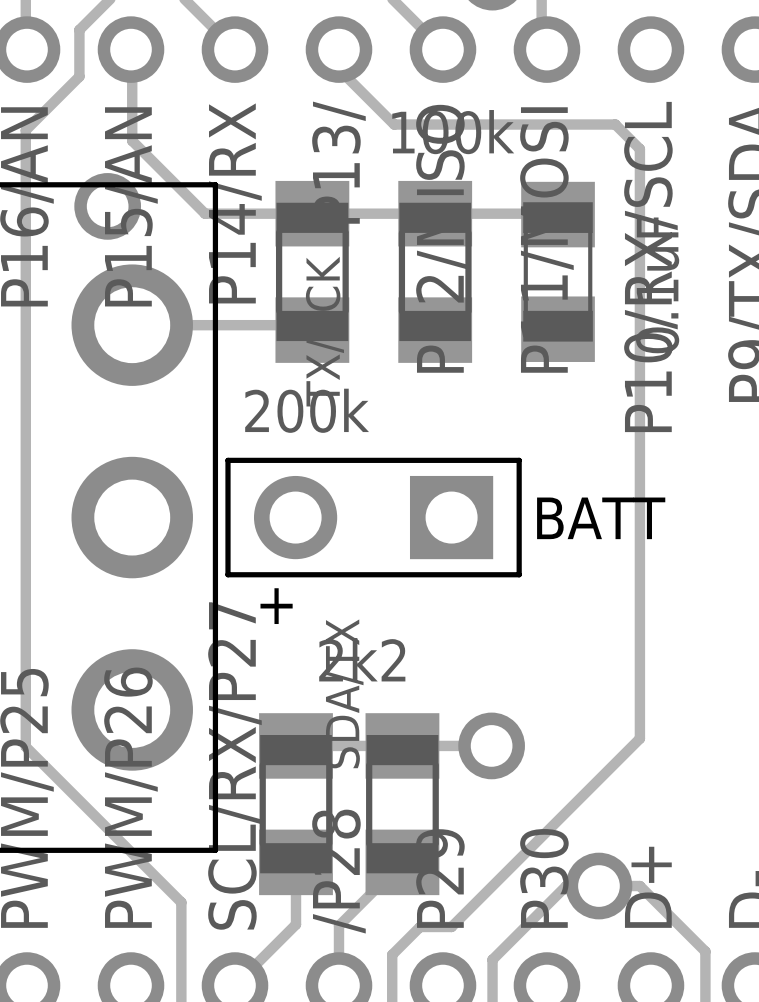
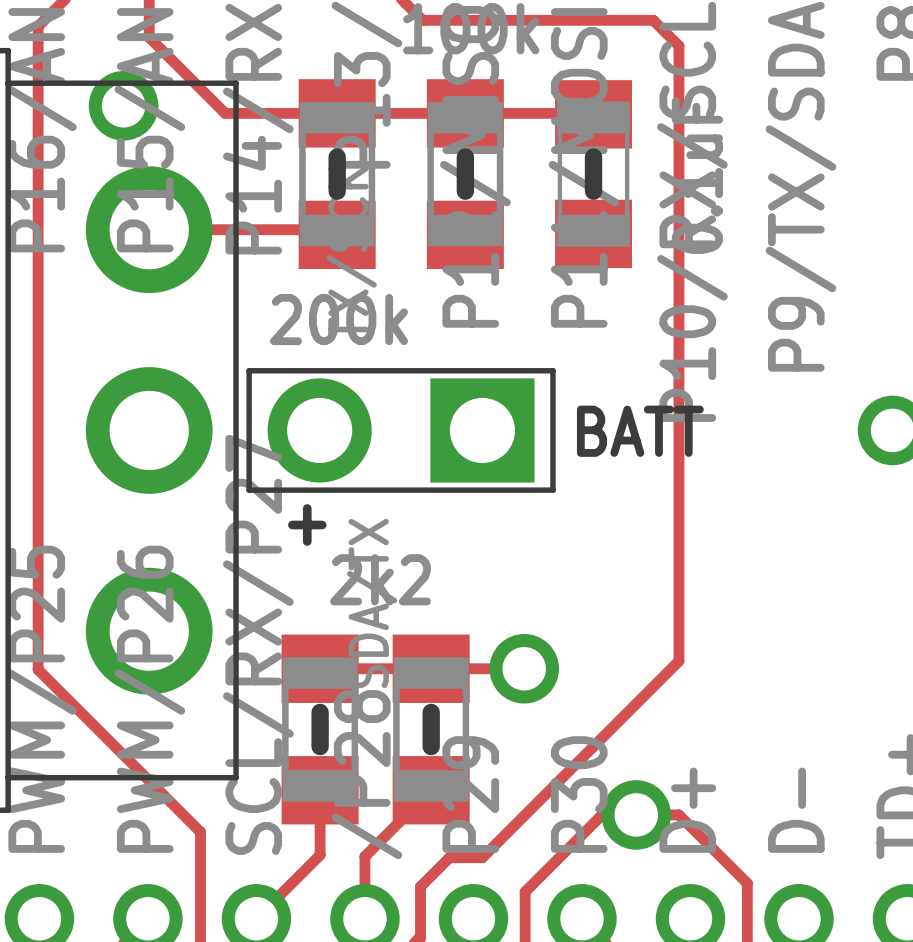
line: none -> (337, 157) (337, 191)
line: none -> (465, 157) (465, 191)
line: none -> (593, 157) (593, 191)
part footprint: [225, 457, 522, 578] -> [246, 368, 556, 493]
line: none -> (320, 712) (320, 746)
line: none -> (431, 712) (431, 746)

